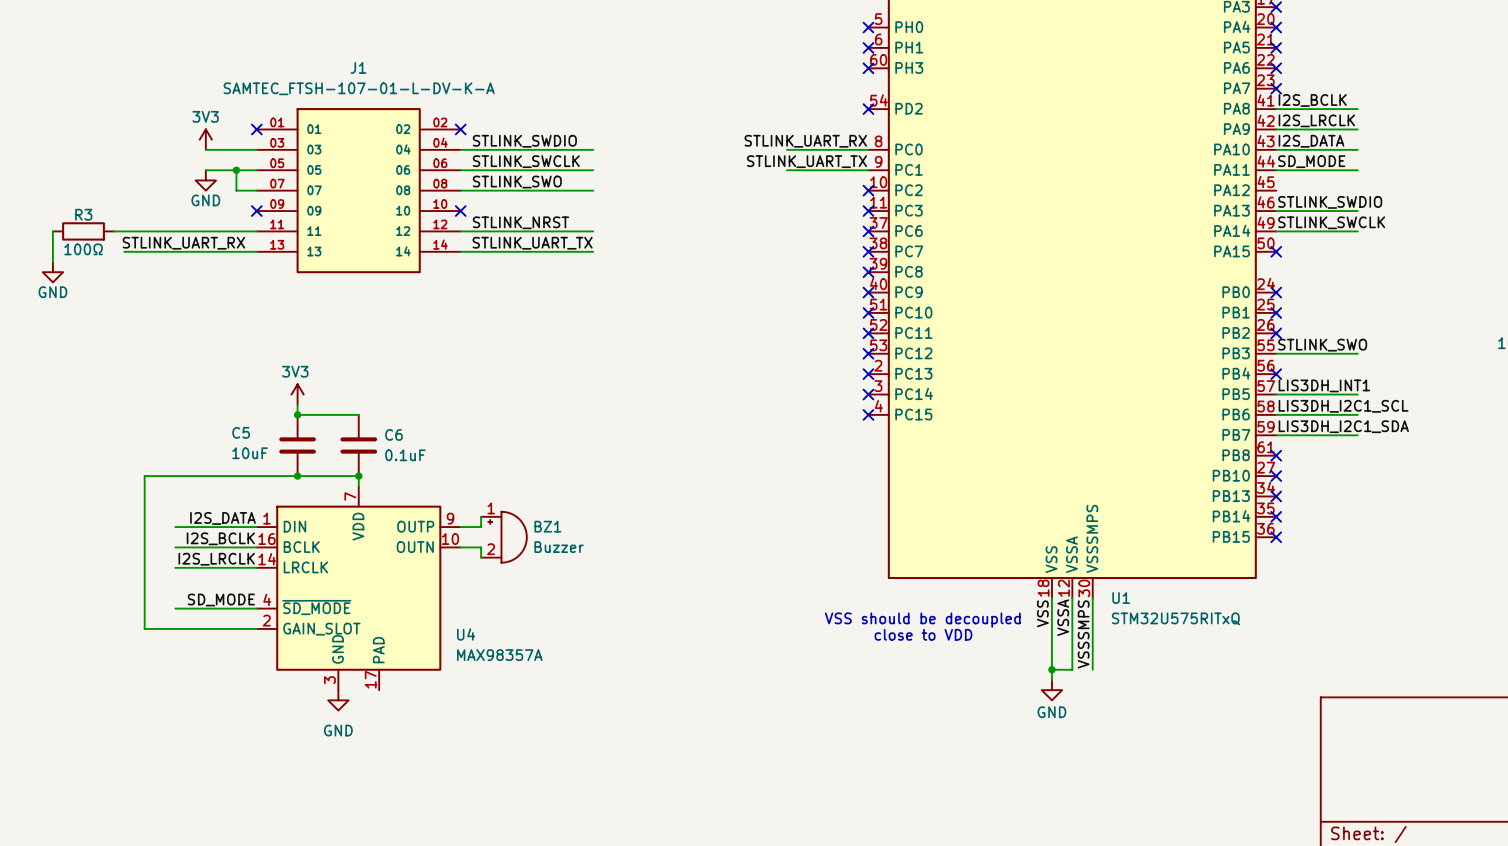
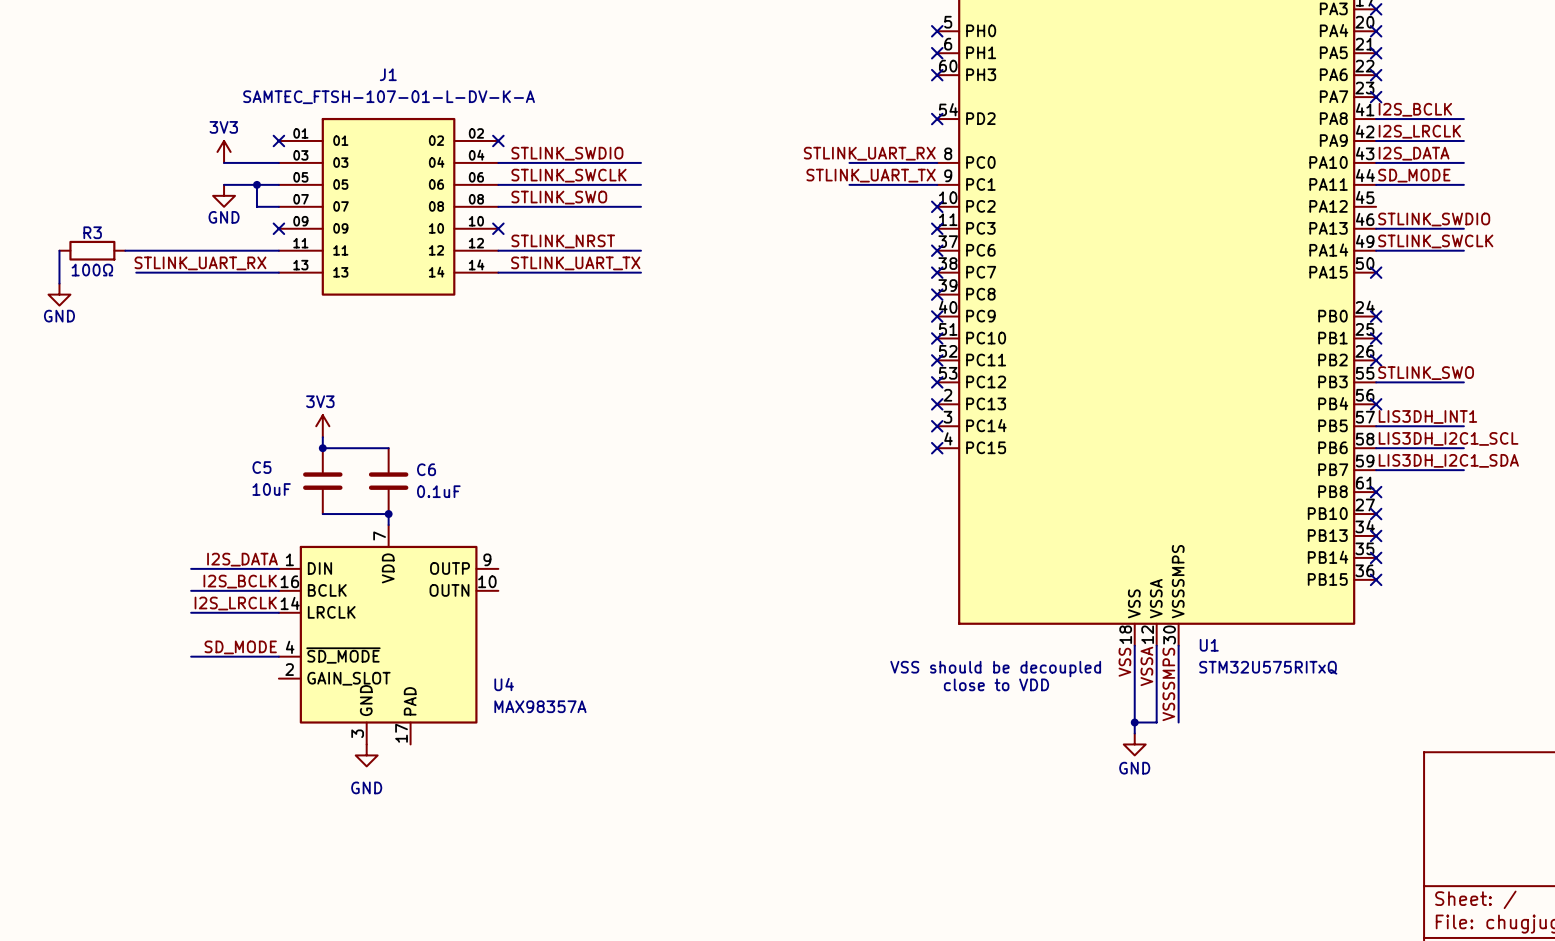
wire: (297, 476) (144, 476) (144, 628) (256, 628) -> none
junction: (297, 476) -> none
wire: (481, 516) (481, 527) (460, 527) -> none
BZ1: Buzzer (503, 537) -> none
wire: (460, 547) (481, 547) (481, 557) -> none

